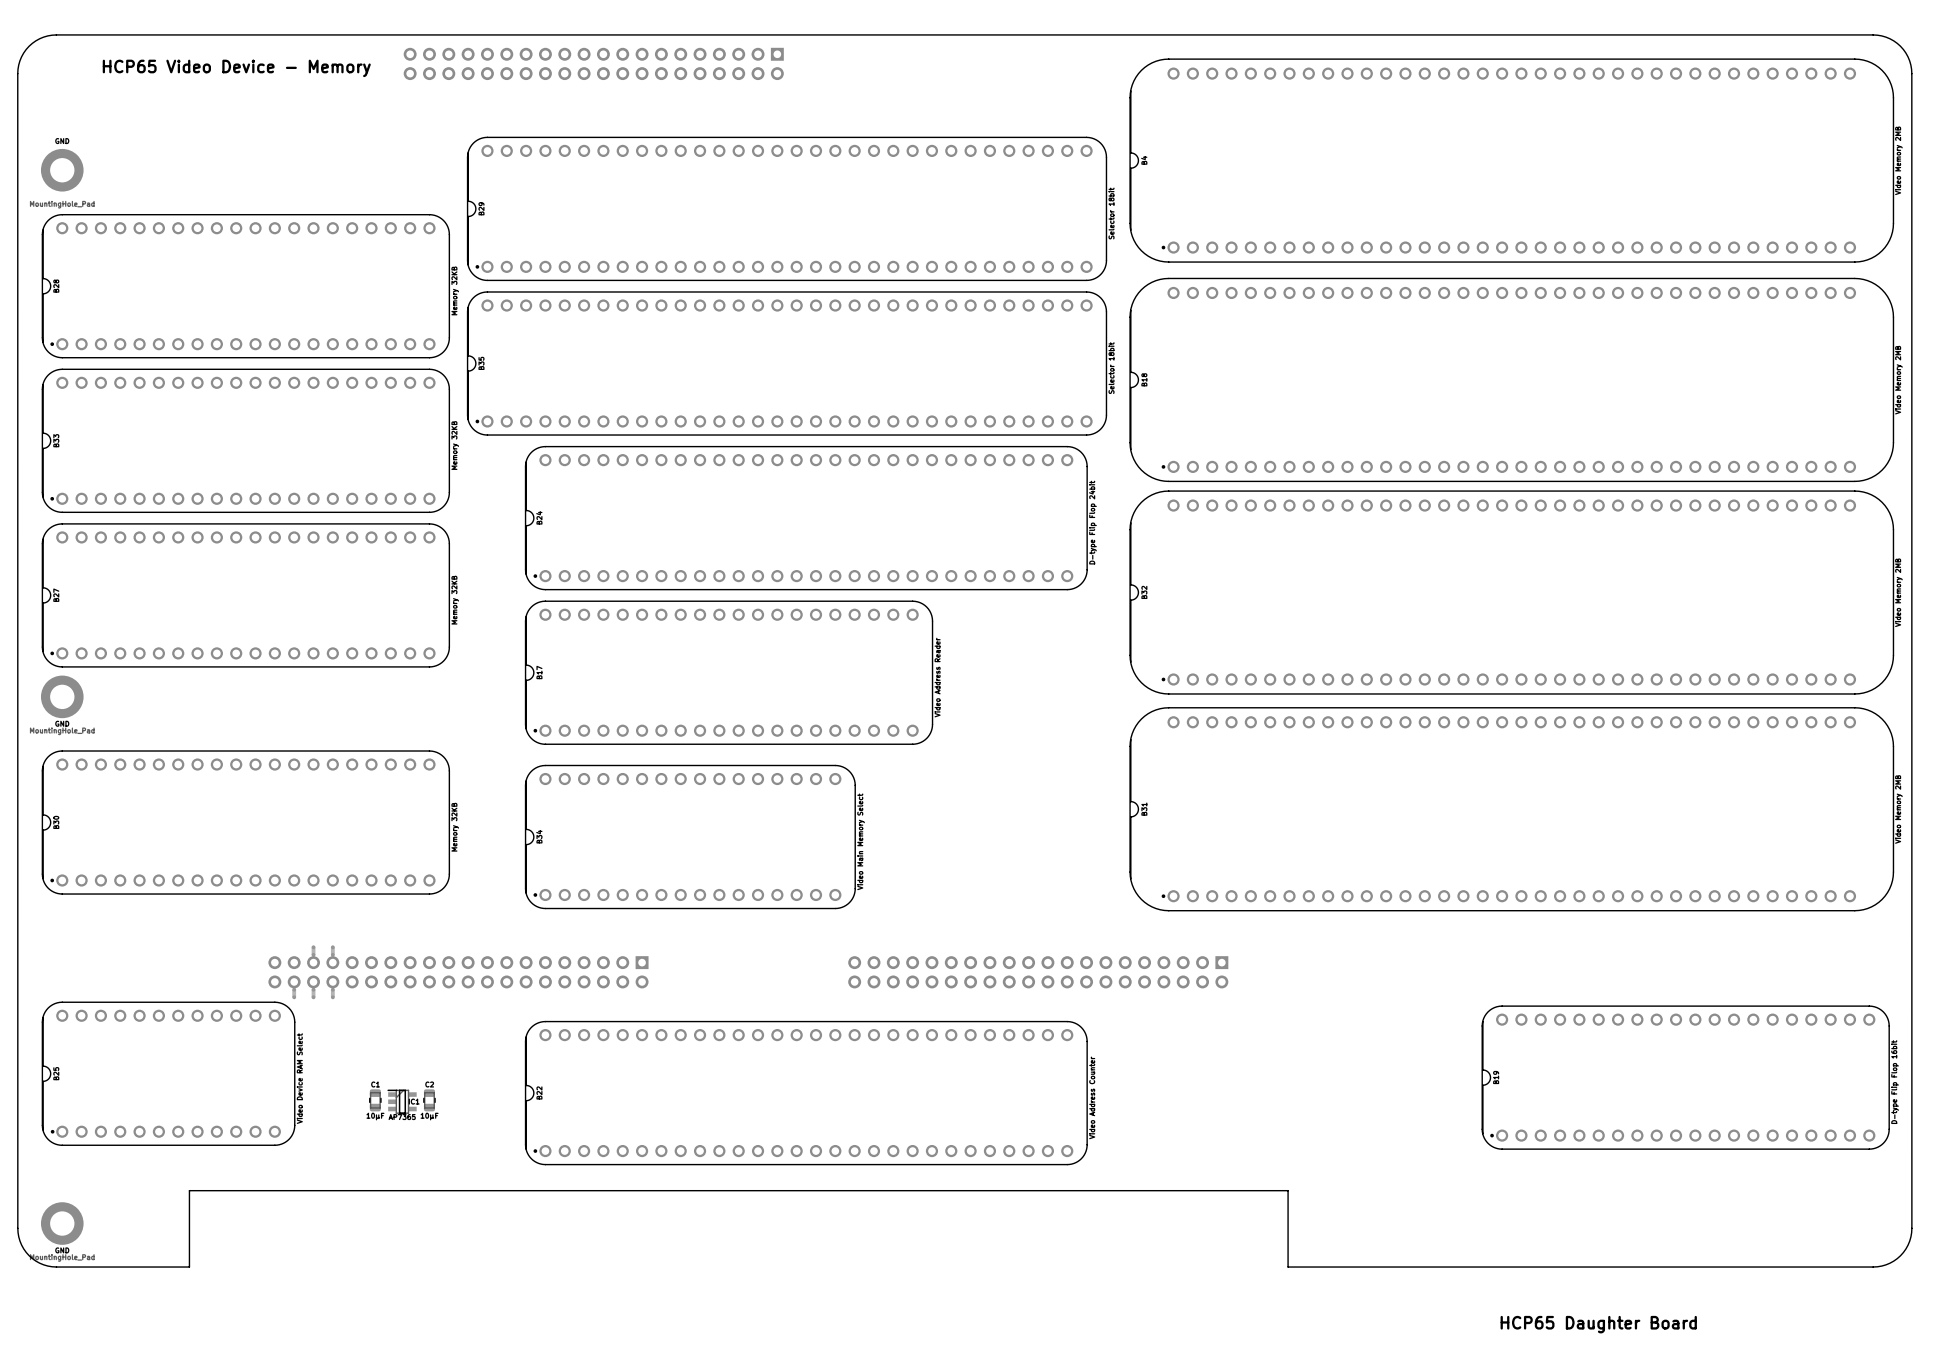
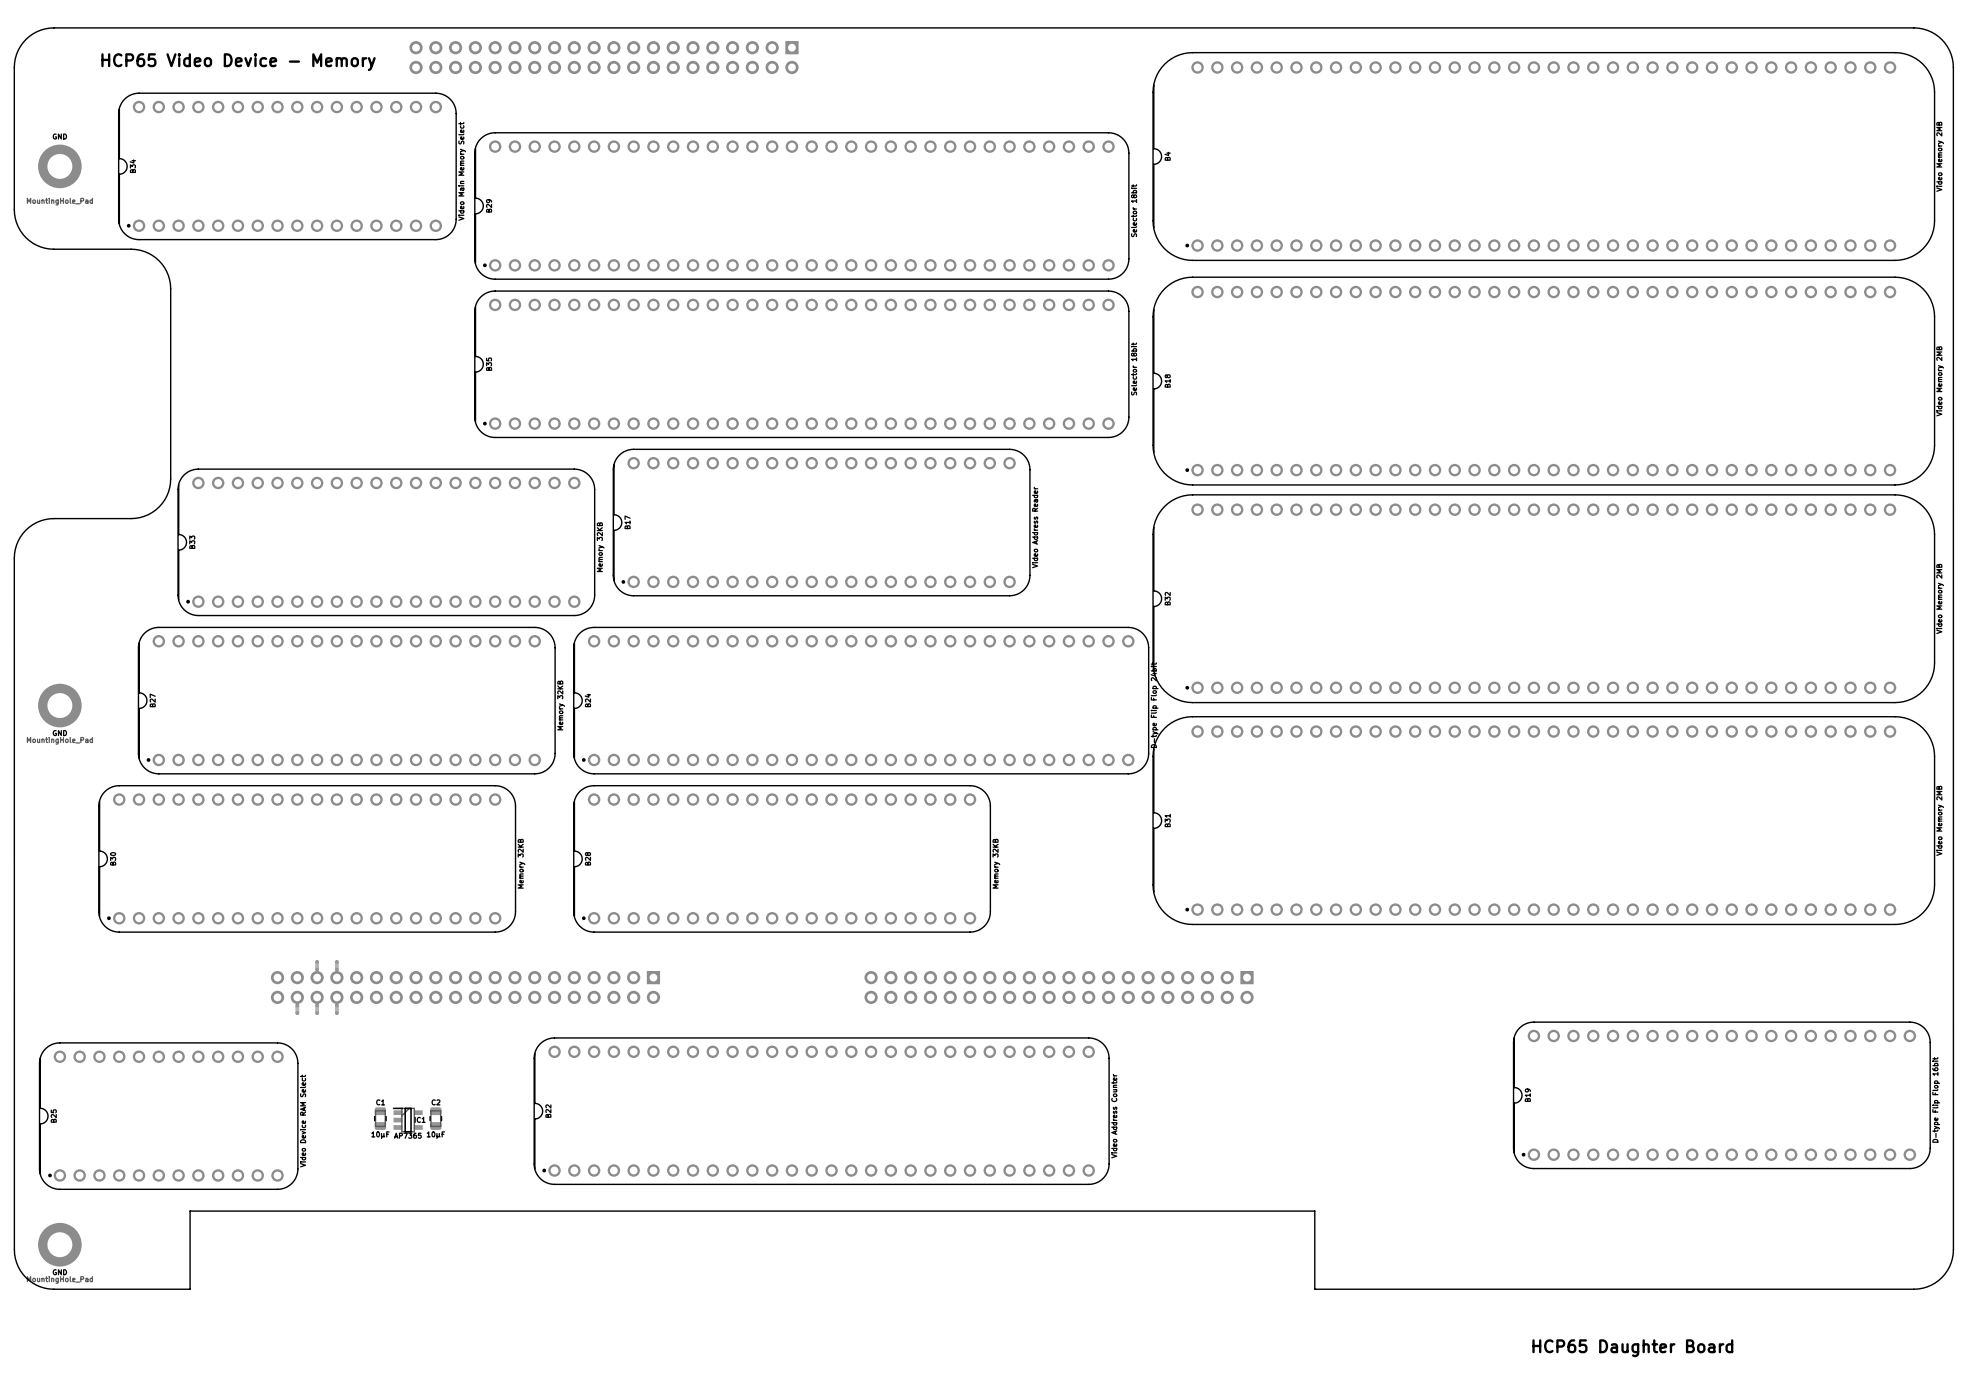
board edge: (17, 212) (17, 1228) -> (14, 209) (20, 230) (36, 245) (49, 248) (131, 249) (144, 251) (162, 264) (168, 275) (170, 288) (170, 479) (164, 500) (152, 512) (135, 518) (53, 518) (40, 520) (22, 533) (14, 553) (14, 1249)
part position: (245, 286) -> (782, 858)
part position: (245, 440) -> (386, 542)
part position: (806, 518) -> (861, 700)
part position: (245, 595) -> (346, 700)
part position: (729, 672) -> (821, 522)
part position: (245, 822) -> (307, 858)
part position: (690, 837) -> (287, 166)
part position: (168, 1073) -> (168, 1116)

